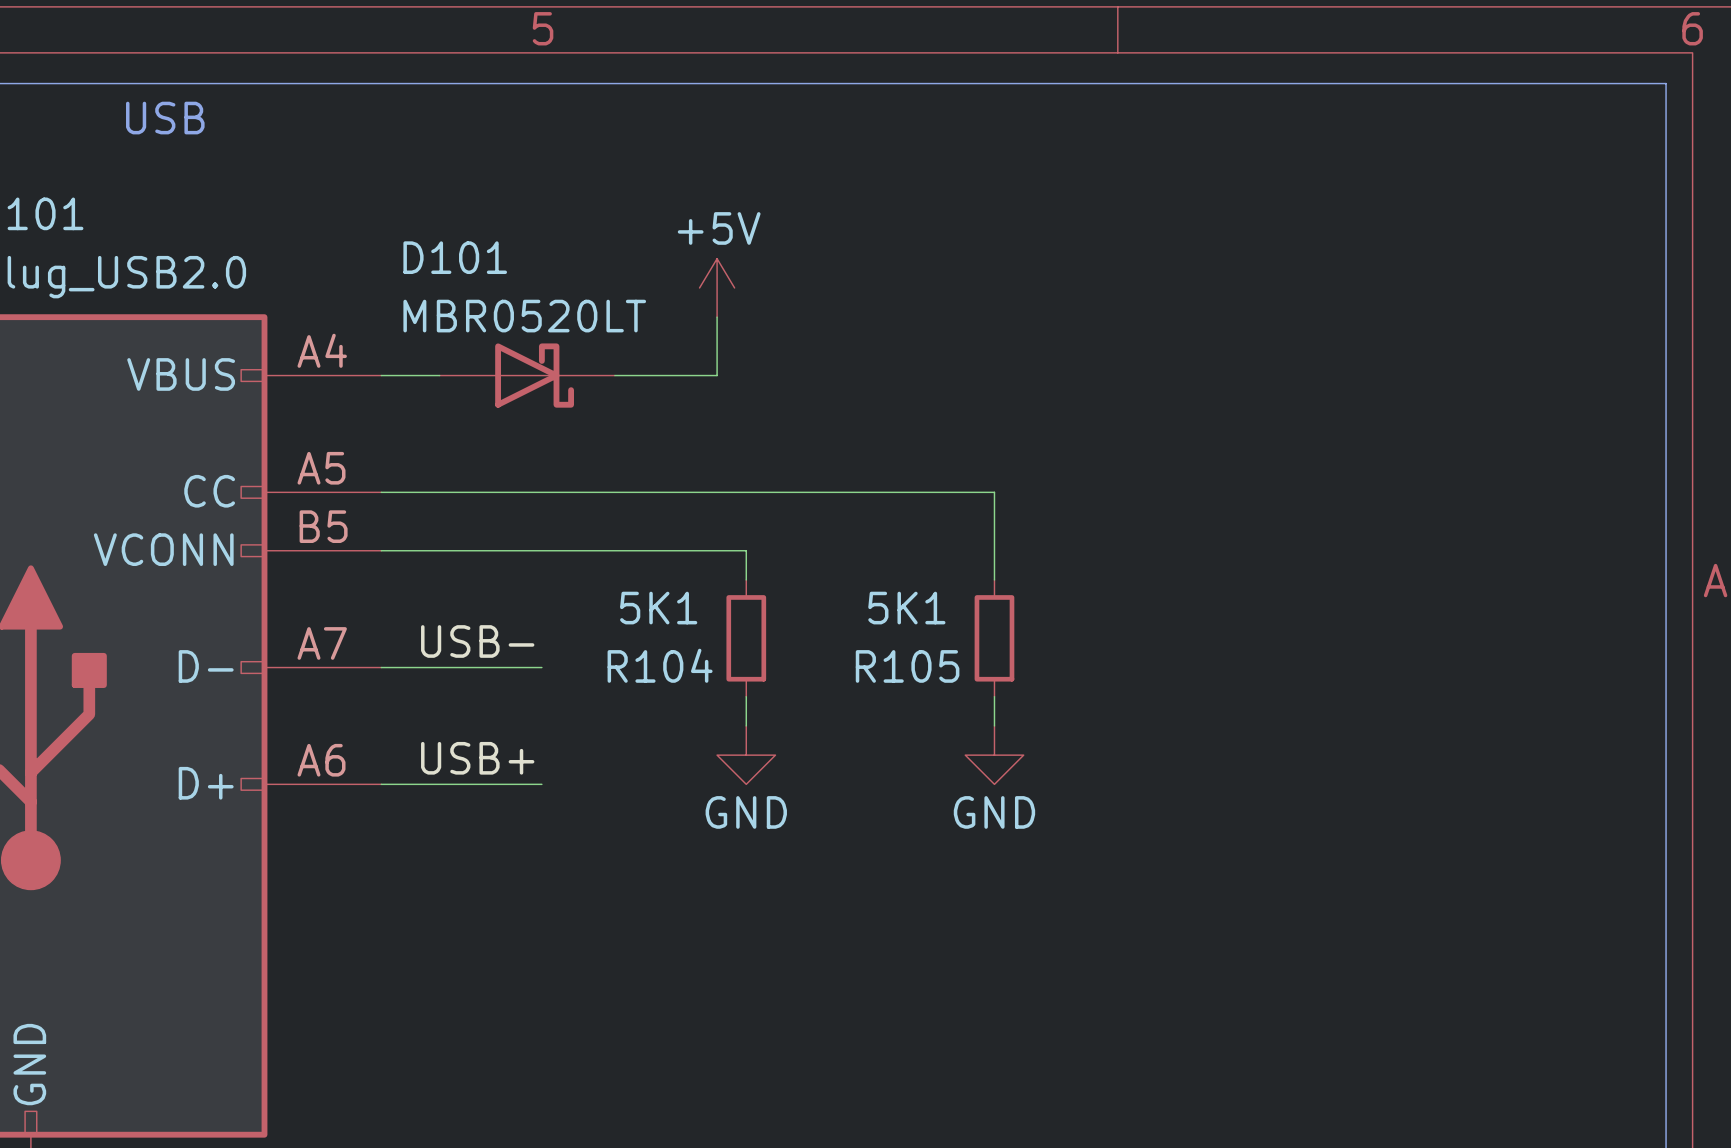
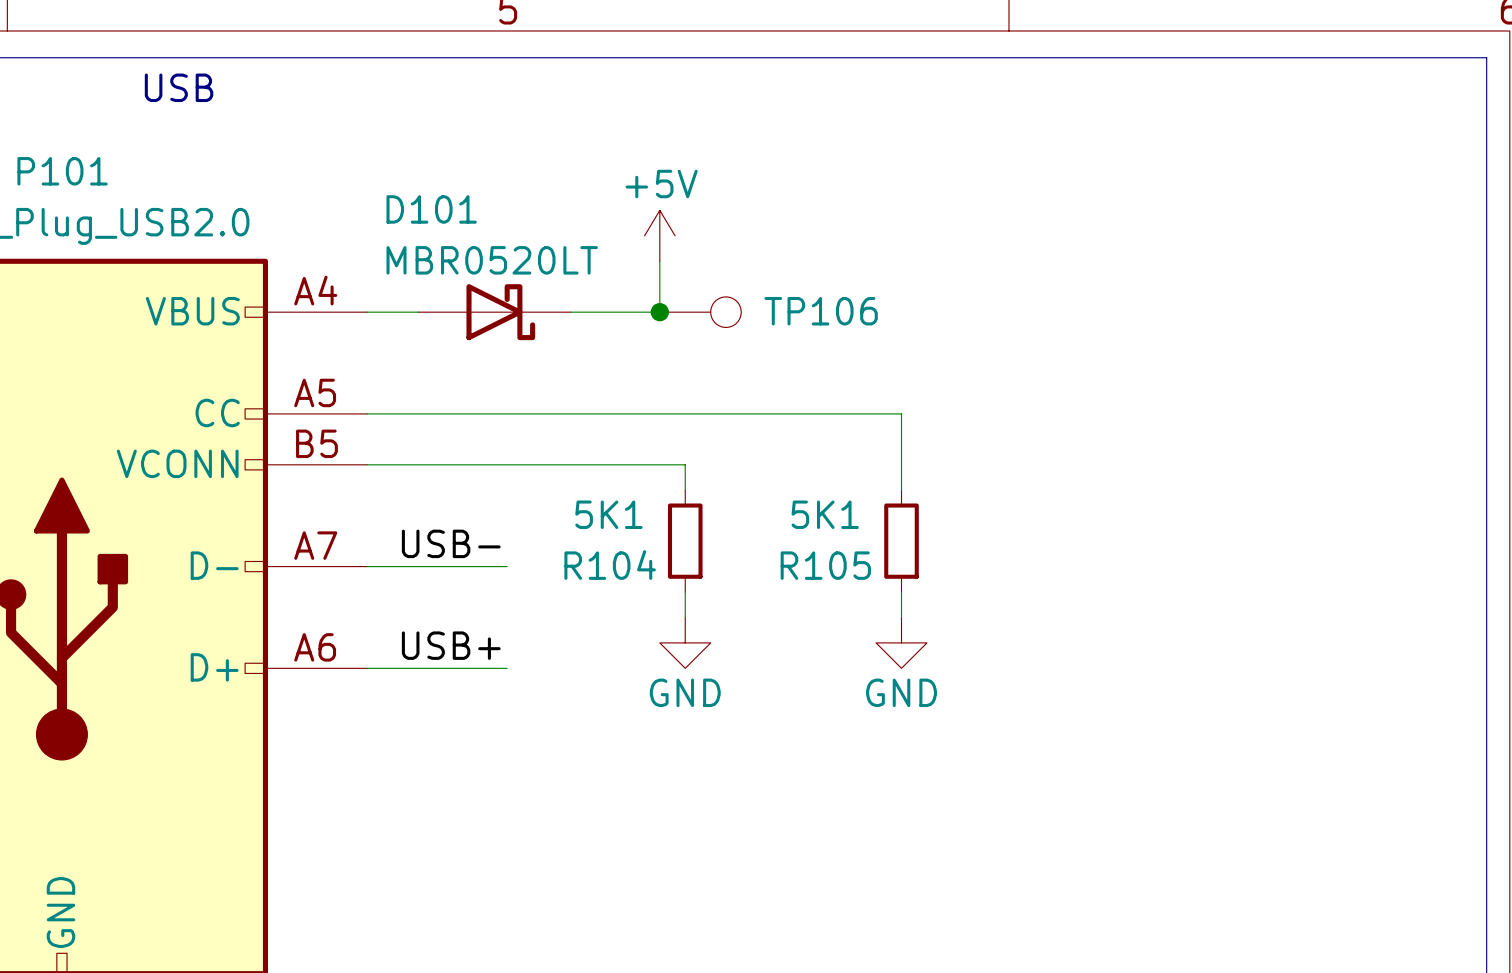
junction: none -> (659, 312)
TP106: none -> (700, 312)

